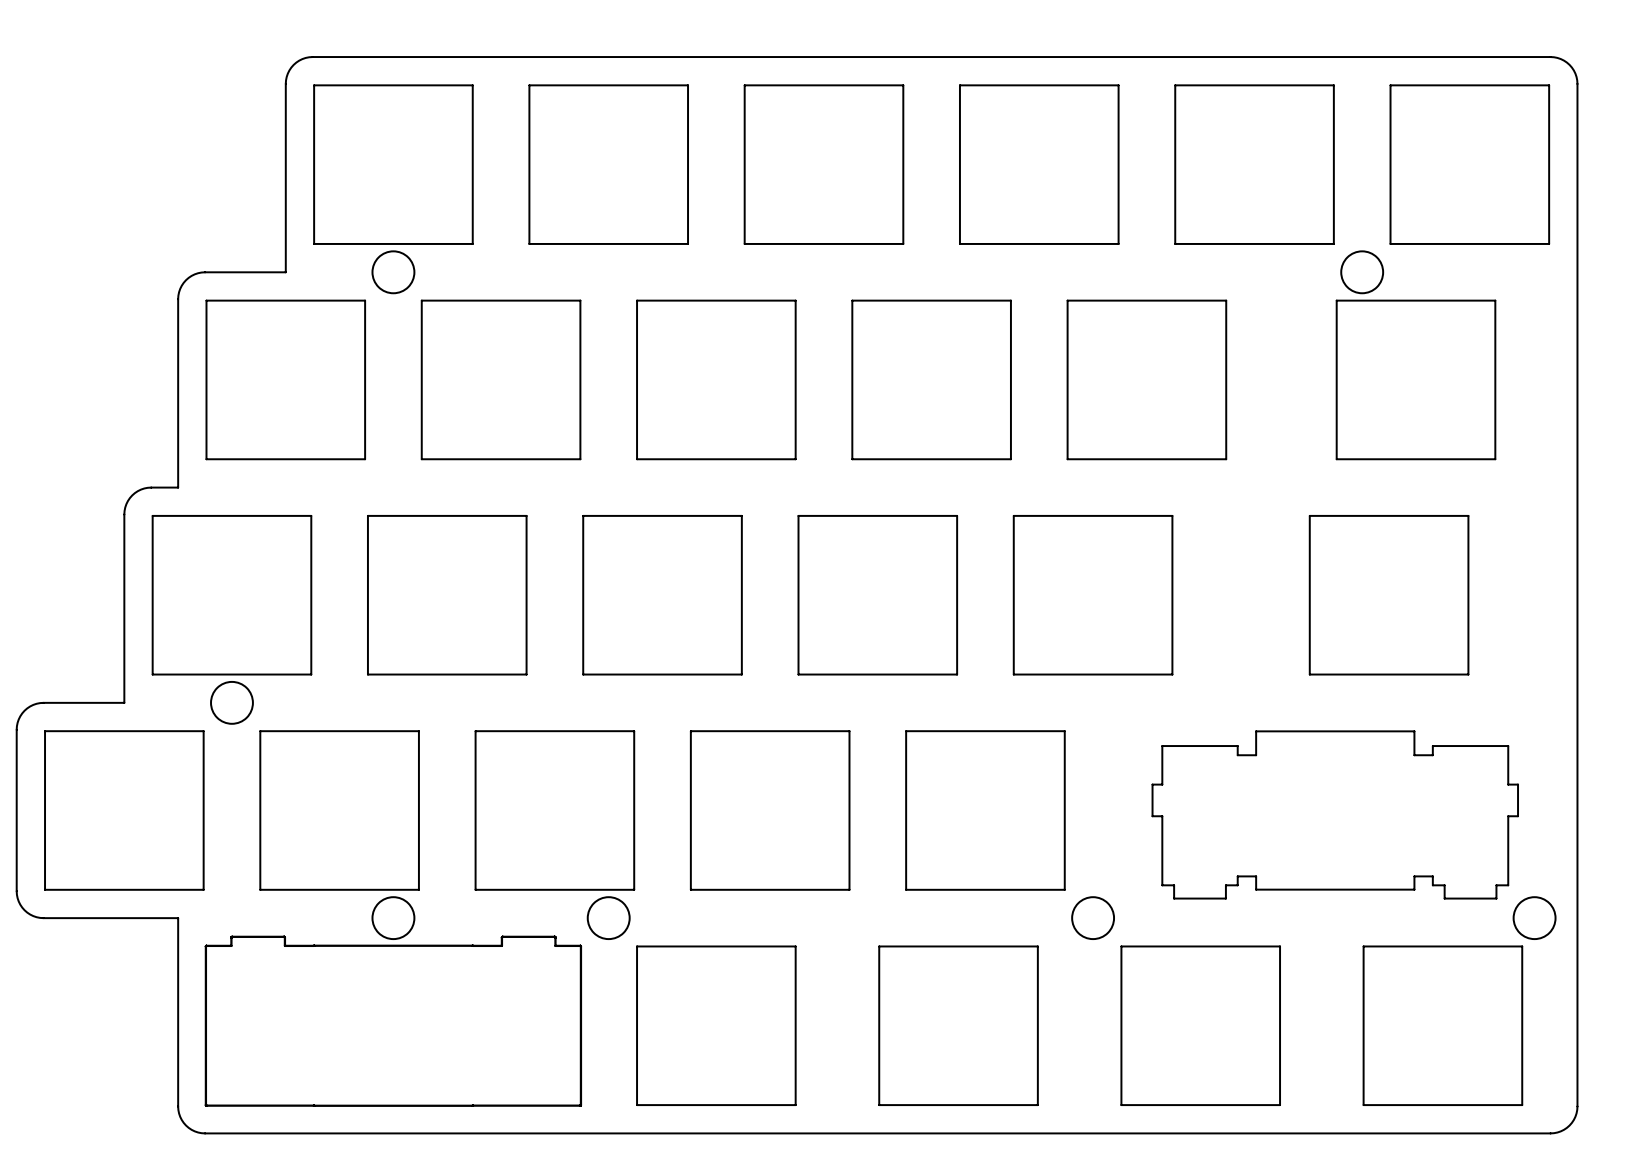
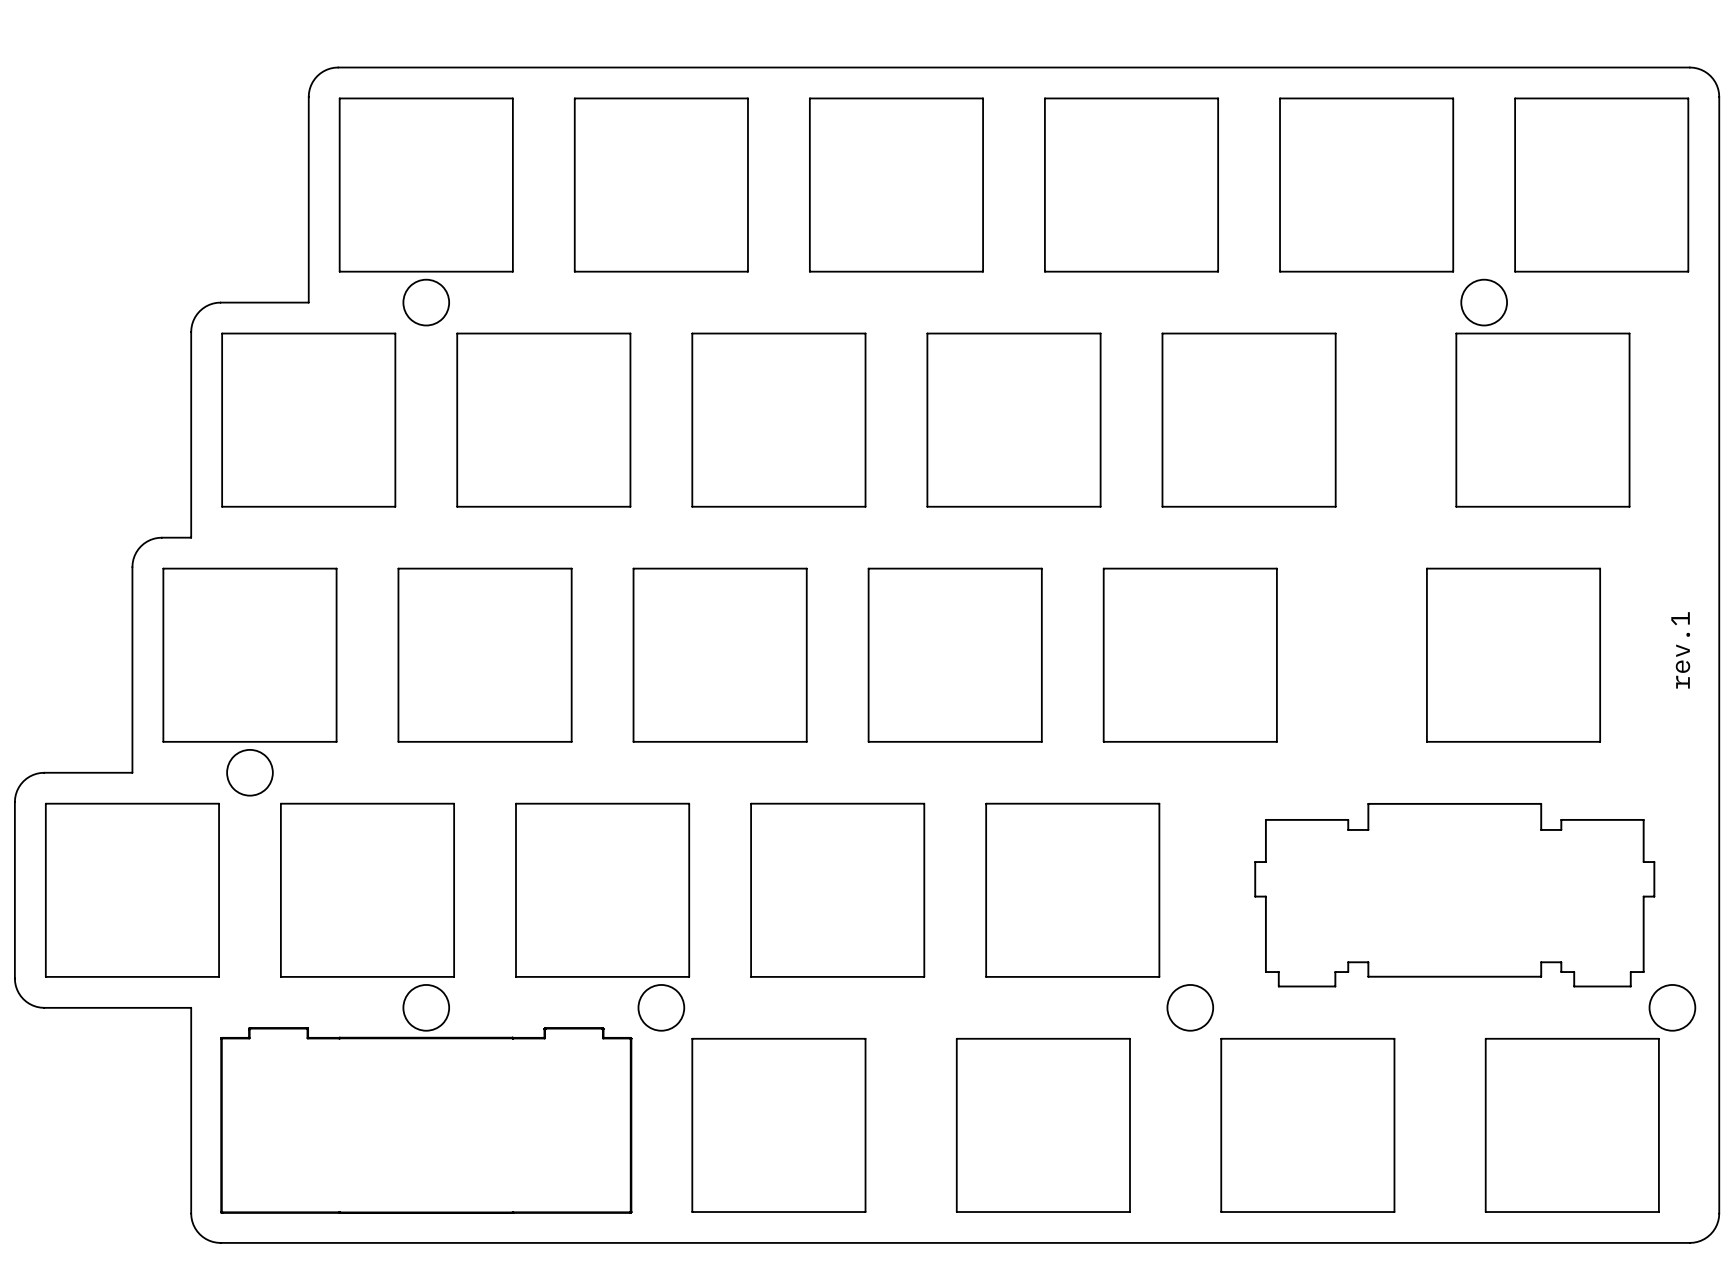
text: none -> rev.1 (1680, 650)

